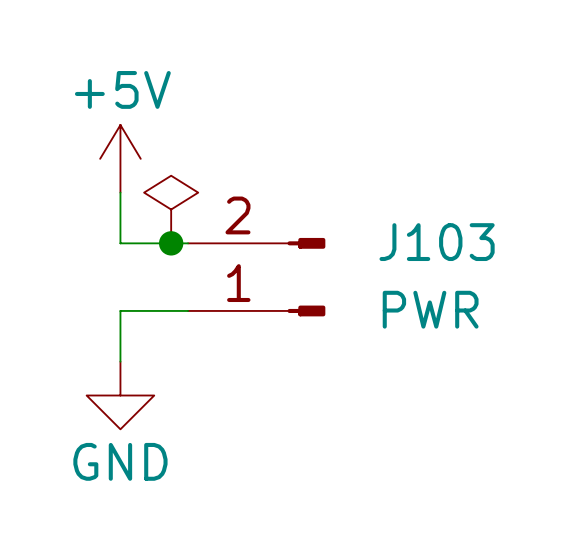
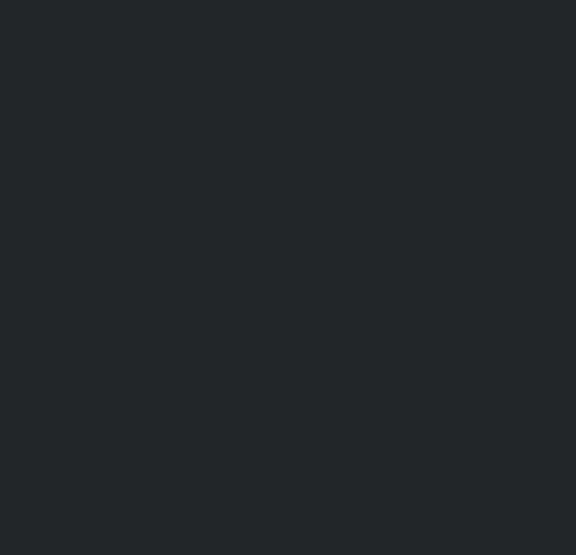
power symbol: +5V (120, 158) -> none
wire: (120, 192) (120, 243) (188, 243) -> none
power symbol: (171, 209) -> none
junction: (171, 243) -> none
J103: PWR (256, 277) -> none
wire: (188, 310) (120, 310) (120, 361) -> none
power symbol: GND (120, 395) -> none

